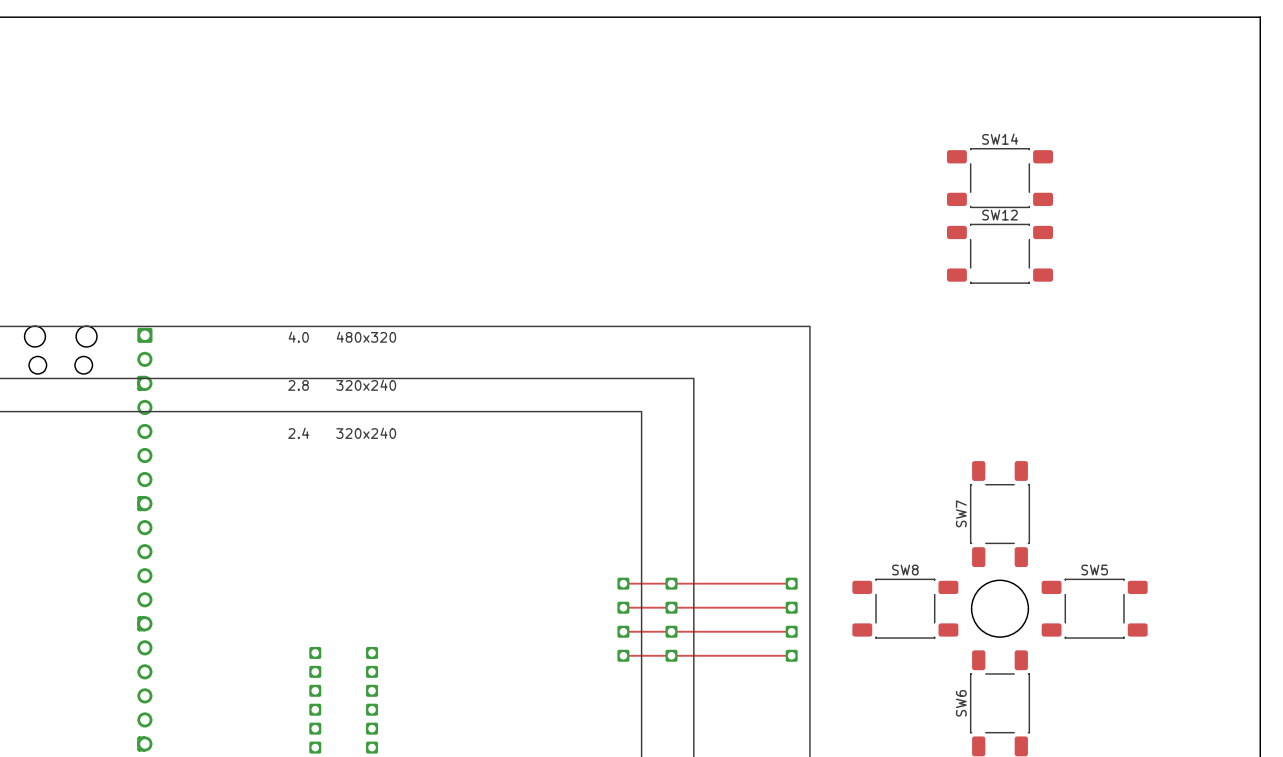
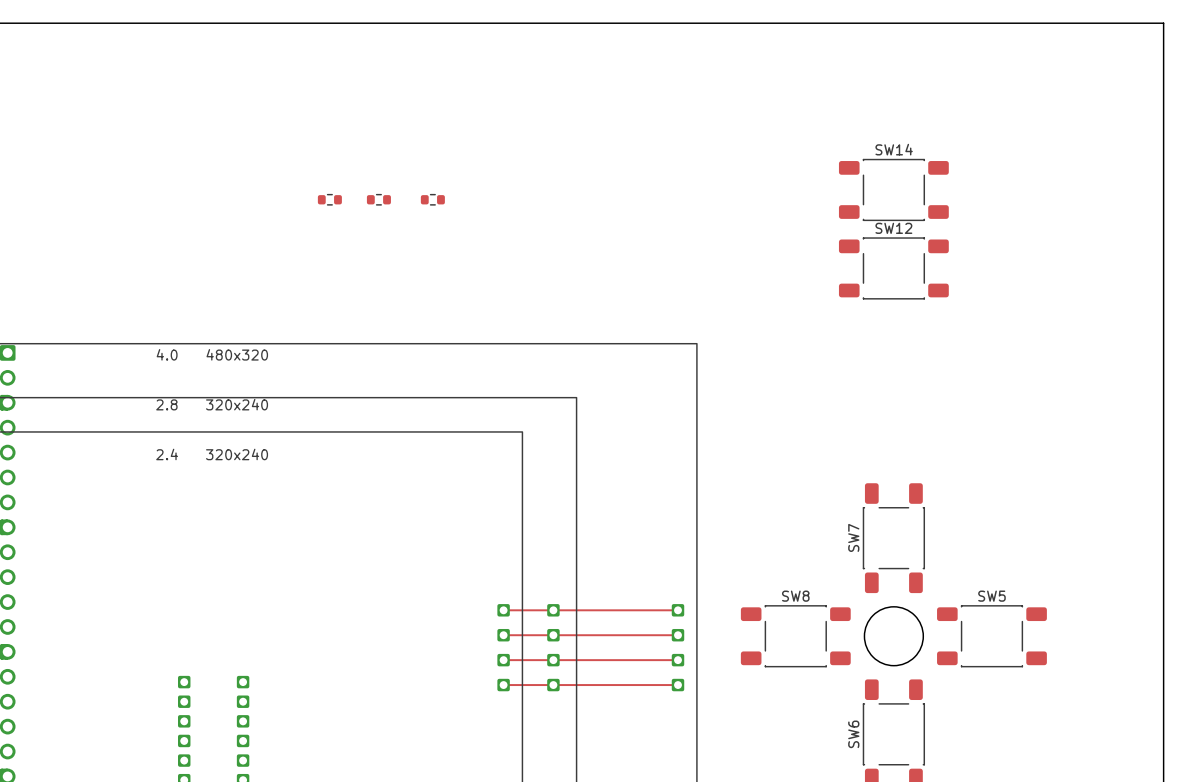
part: none -> (329, 199)
part: none -> (378, 199)
part: none -> (432, 199)

